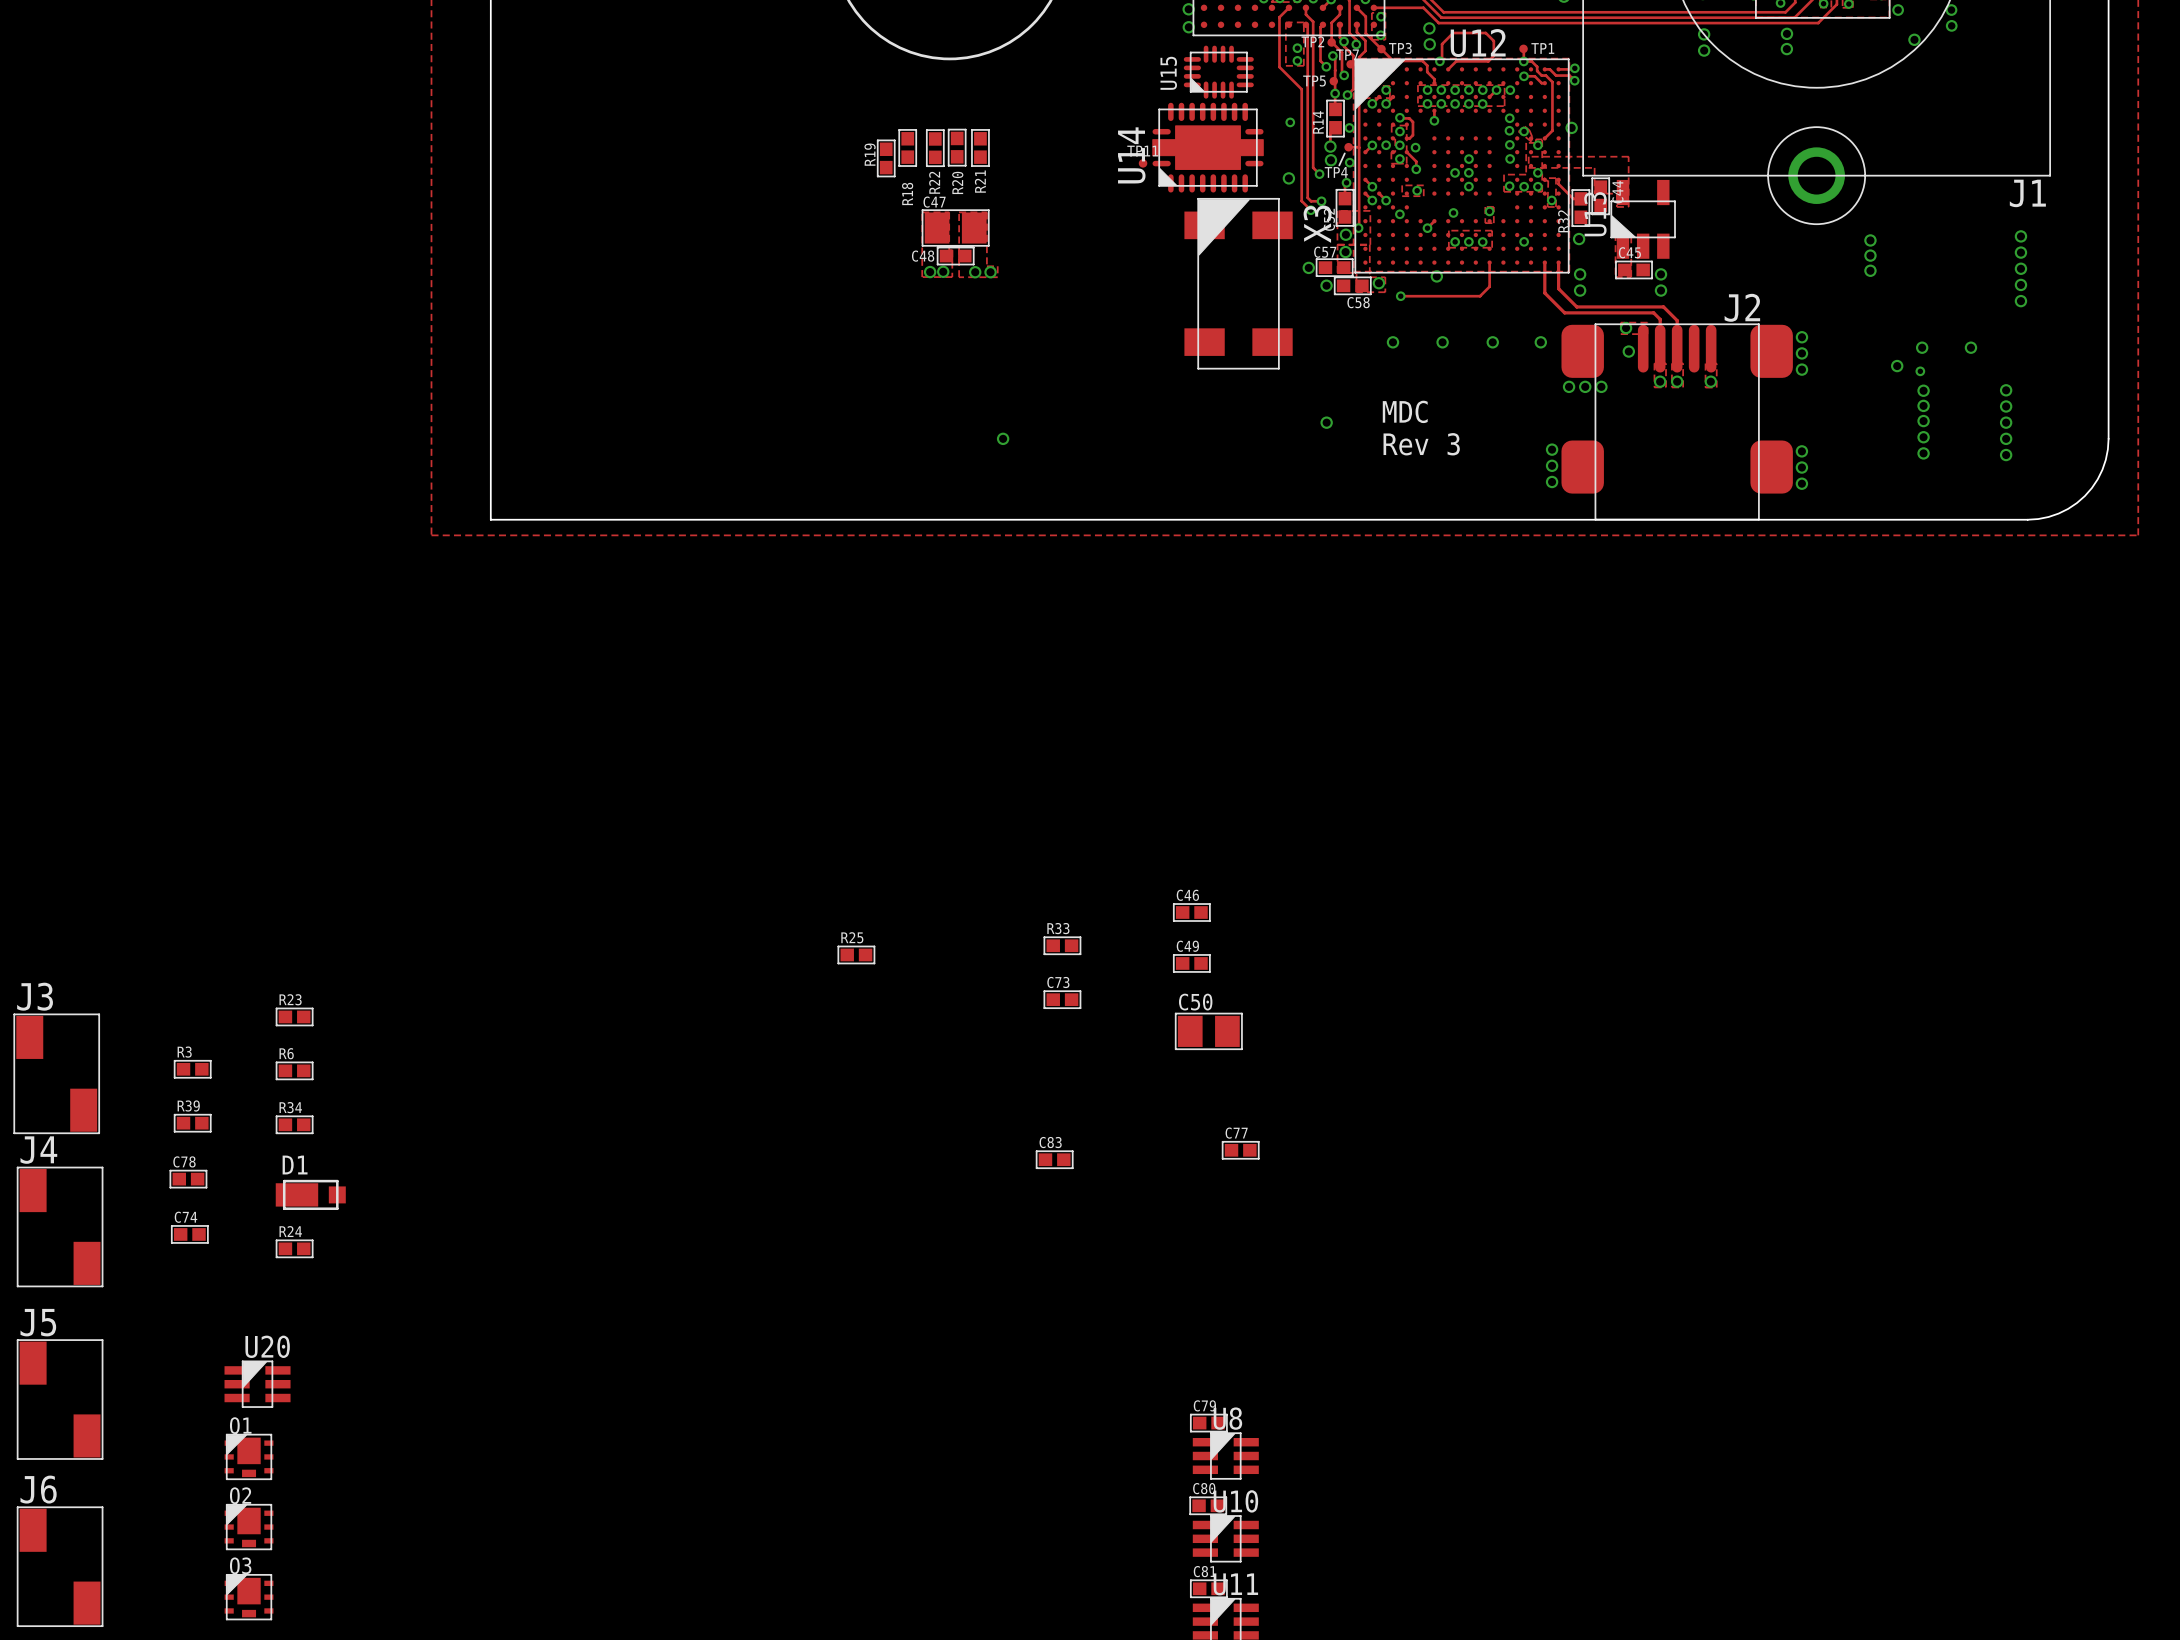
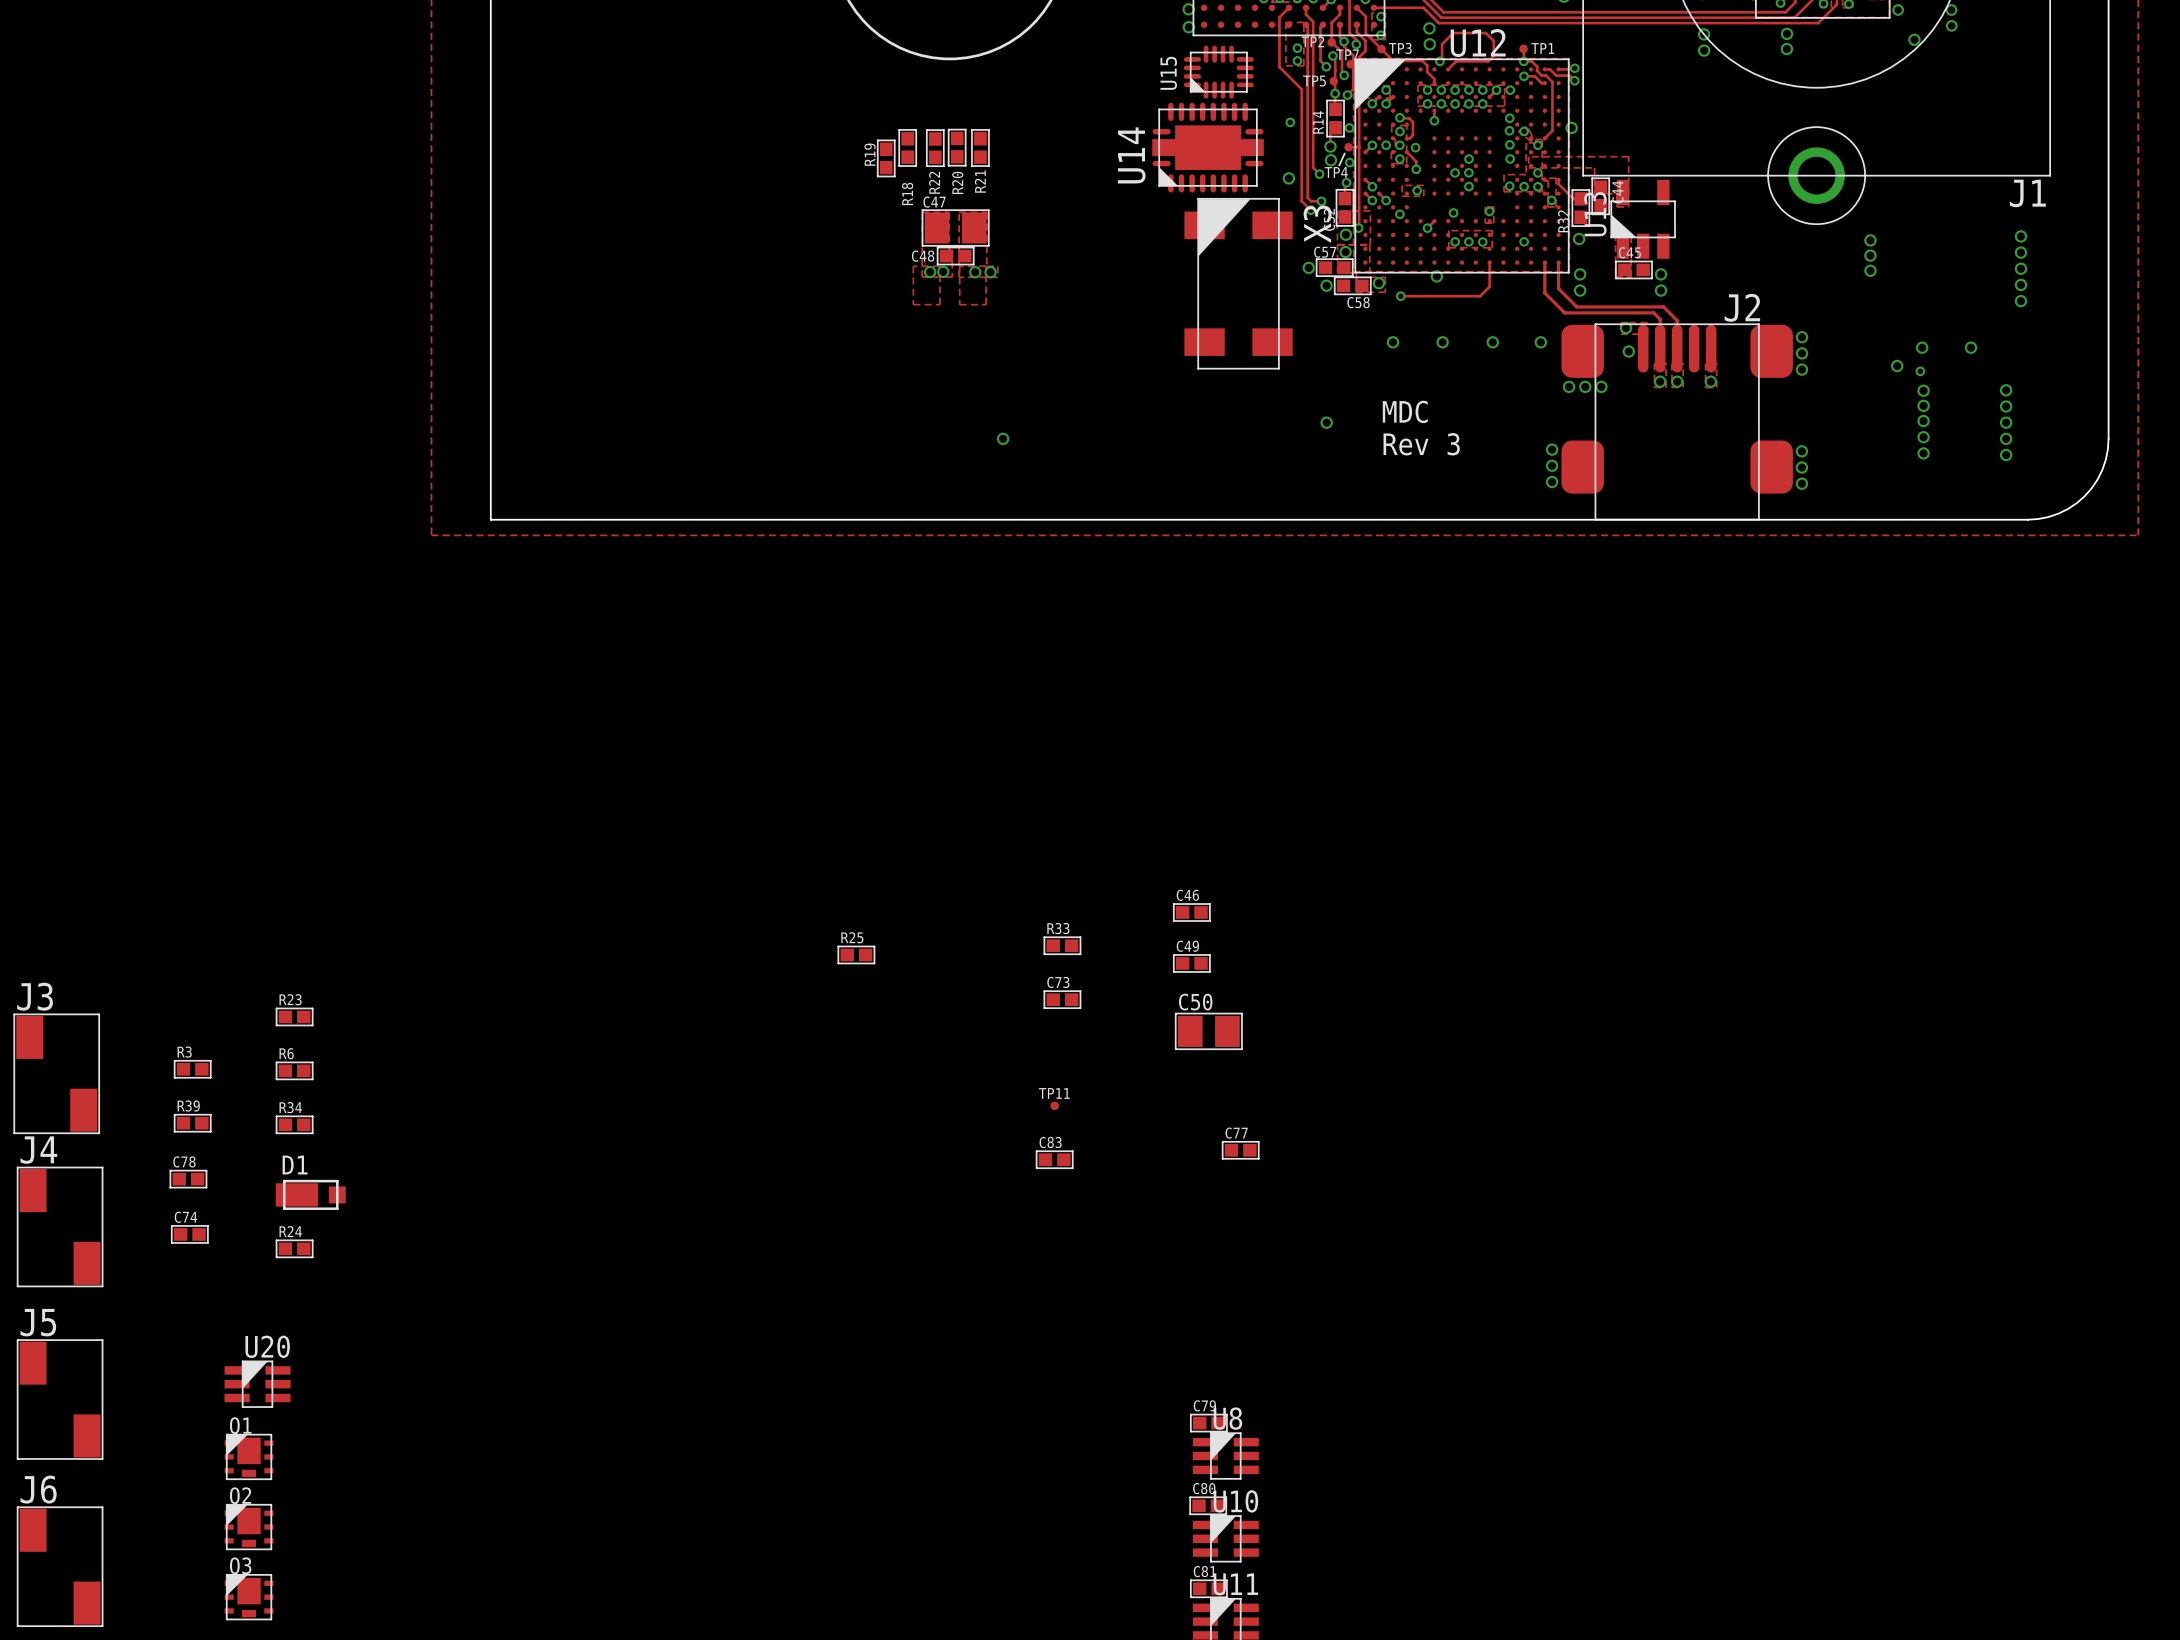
TP11 position: (1143, 163) -> (1054, 1105)
zone outline: none -> (913, 266) (913, 304) (939, 304) (939, 266) (913, 266)
zone outline: none -> (959, 266) (986, 266) (986, 304) (959, 304) (959, 266)

